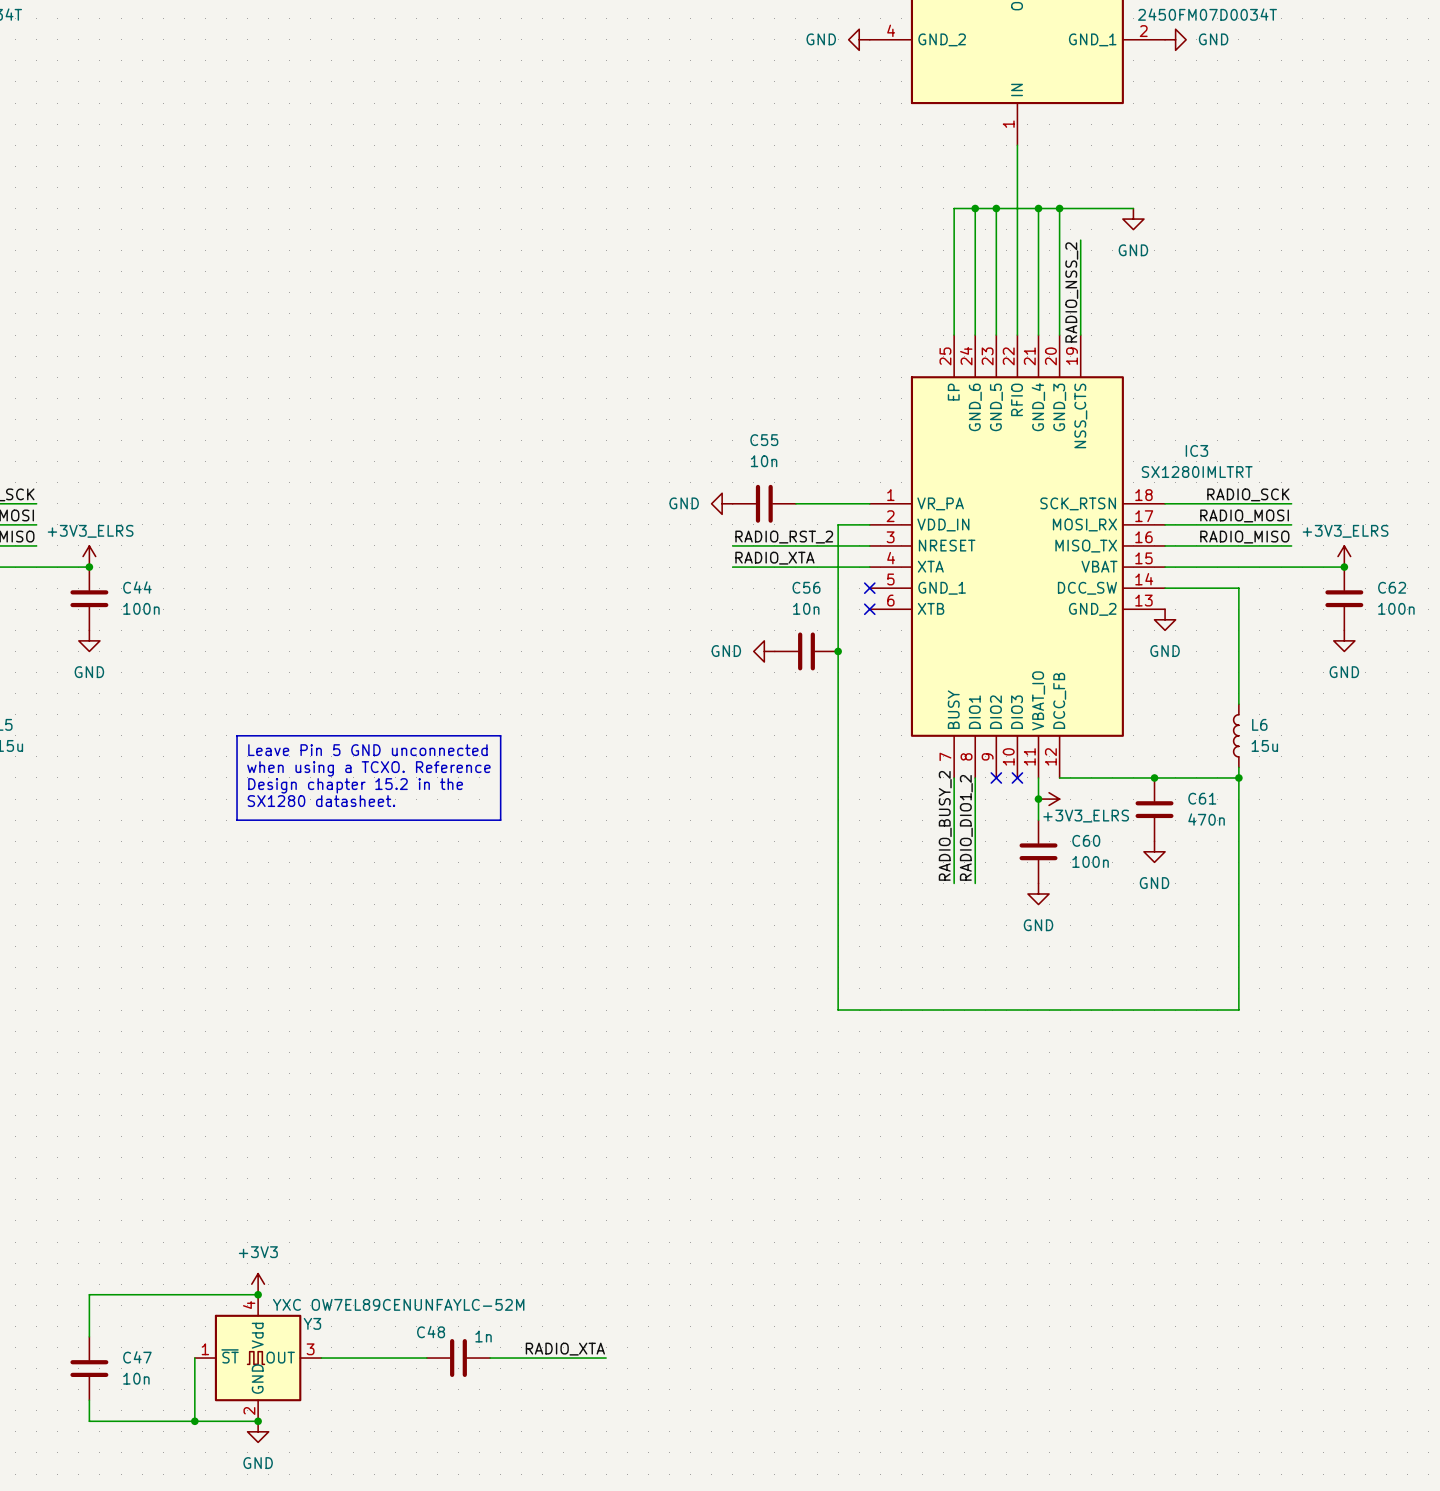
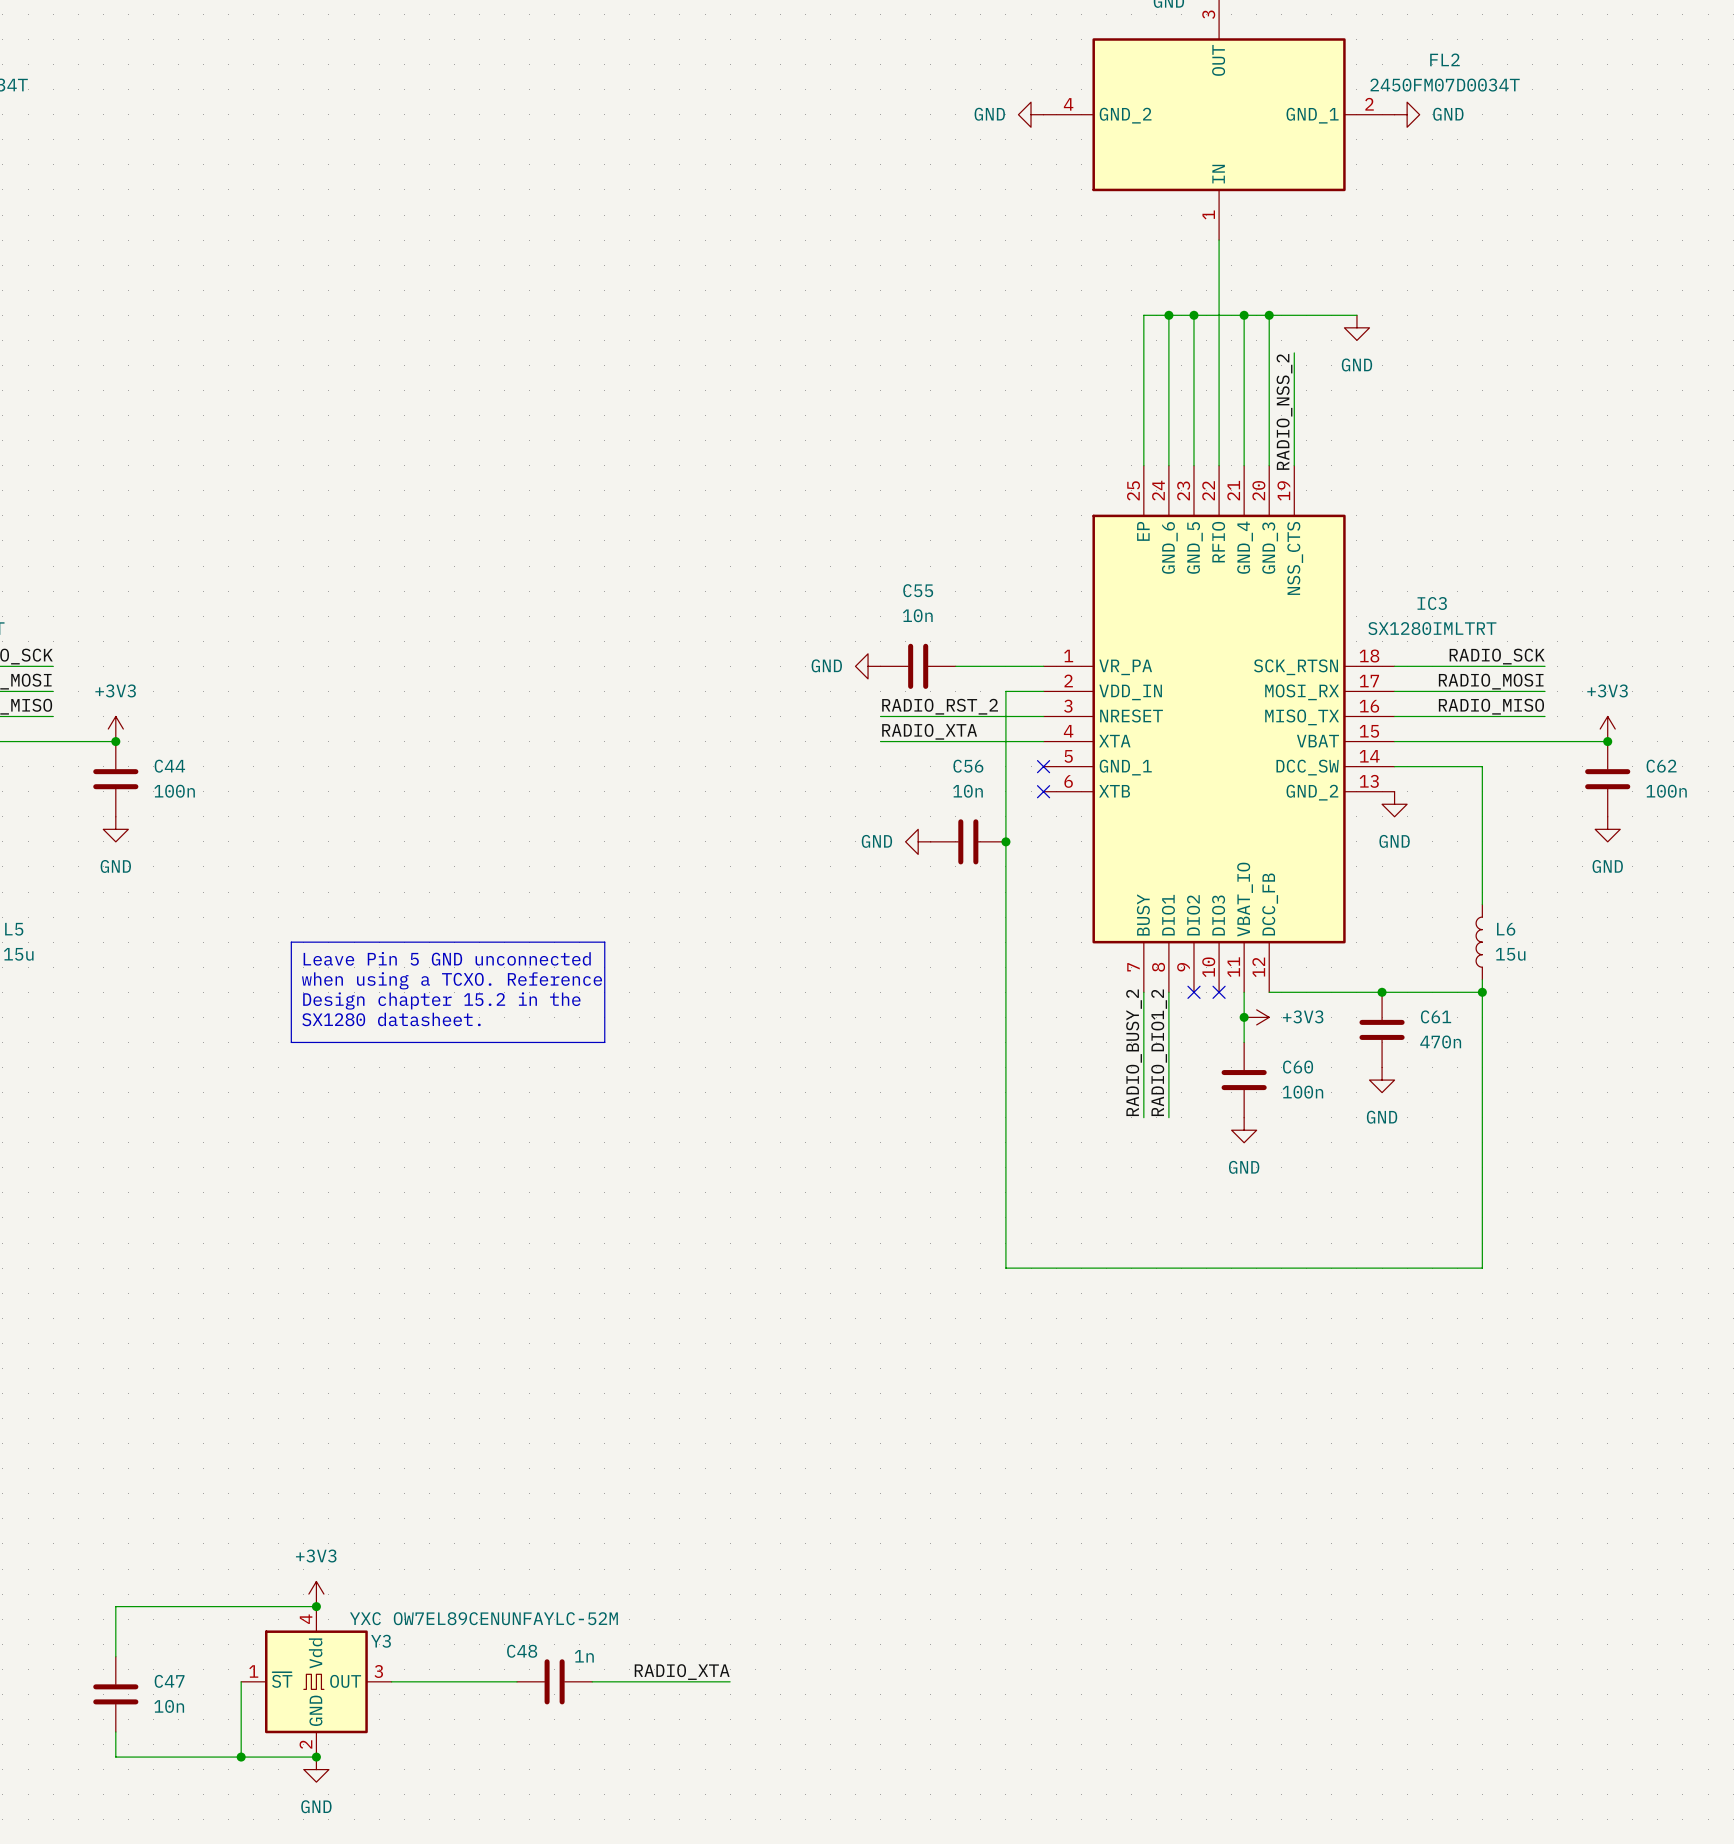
power symbol: +3V3_ELRS (89, 556) -> +3V3 (115, 729)
power symbol: +3V3_ELRS (1344, 556) -> +3V3 (1607, 729)
power symbol: +3V3_ELRS (1049, 799) -> +3V3 (1256, 1017)

